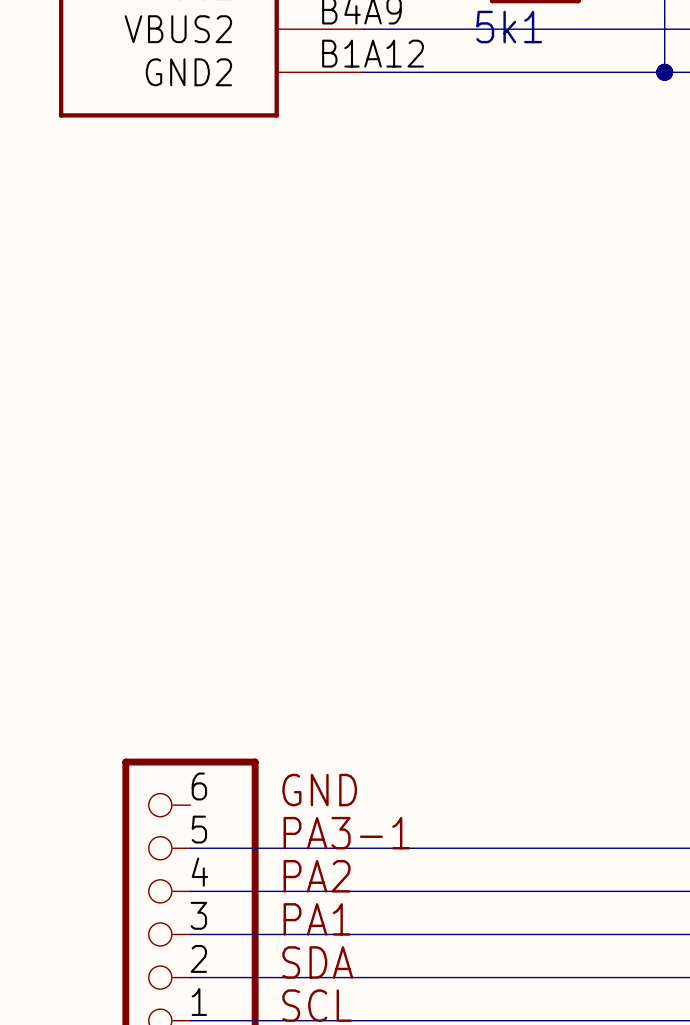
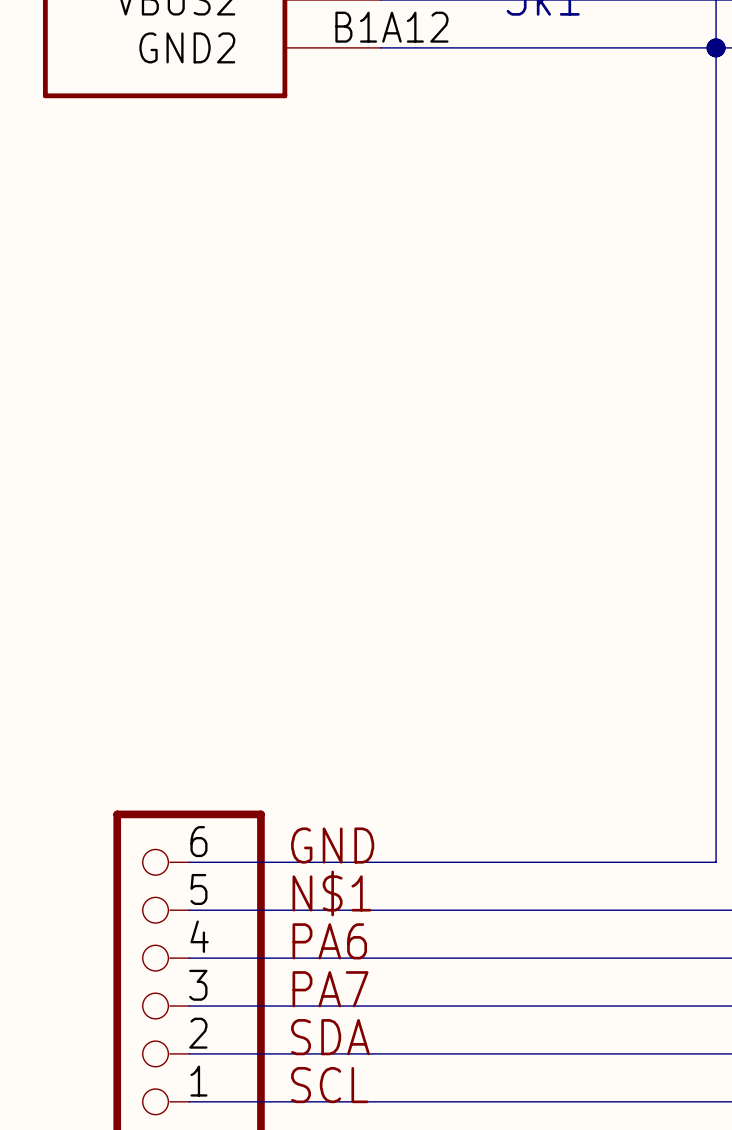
wire: none -> (716, 47) (716, 862) (189, 862)
label: PA3-1 (346, 833) -> N$1 (331, 893)
label: PA2 (317, 876) -> PA6 (329, 941)
label: PA1 (317, 919) -> PA7 (330, 989)

